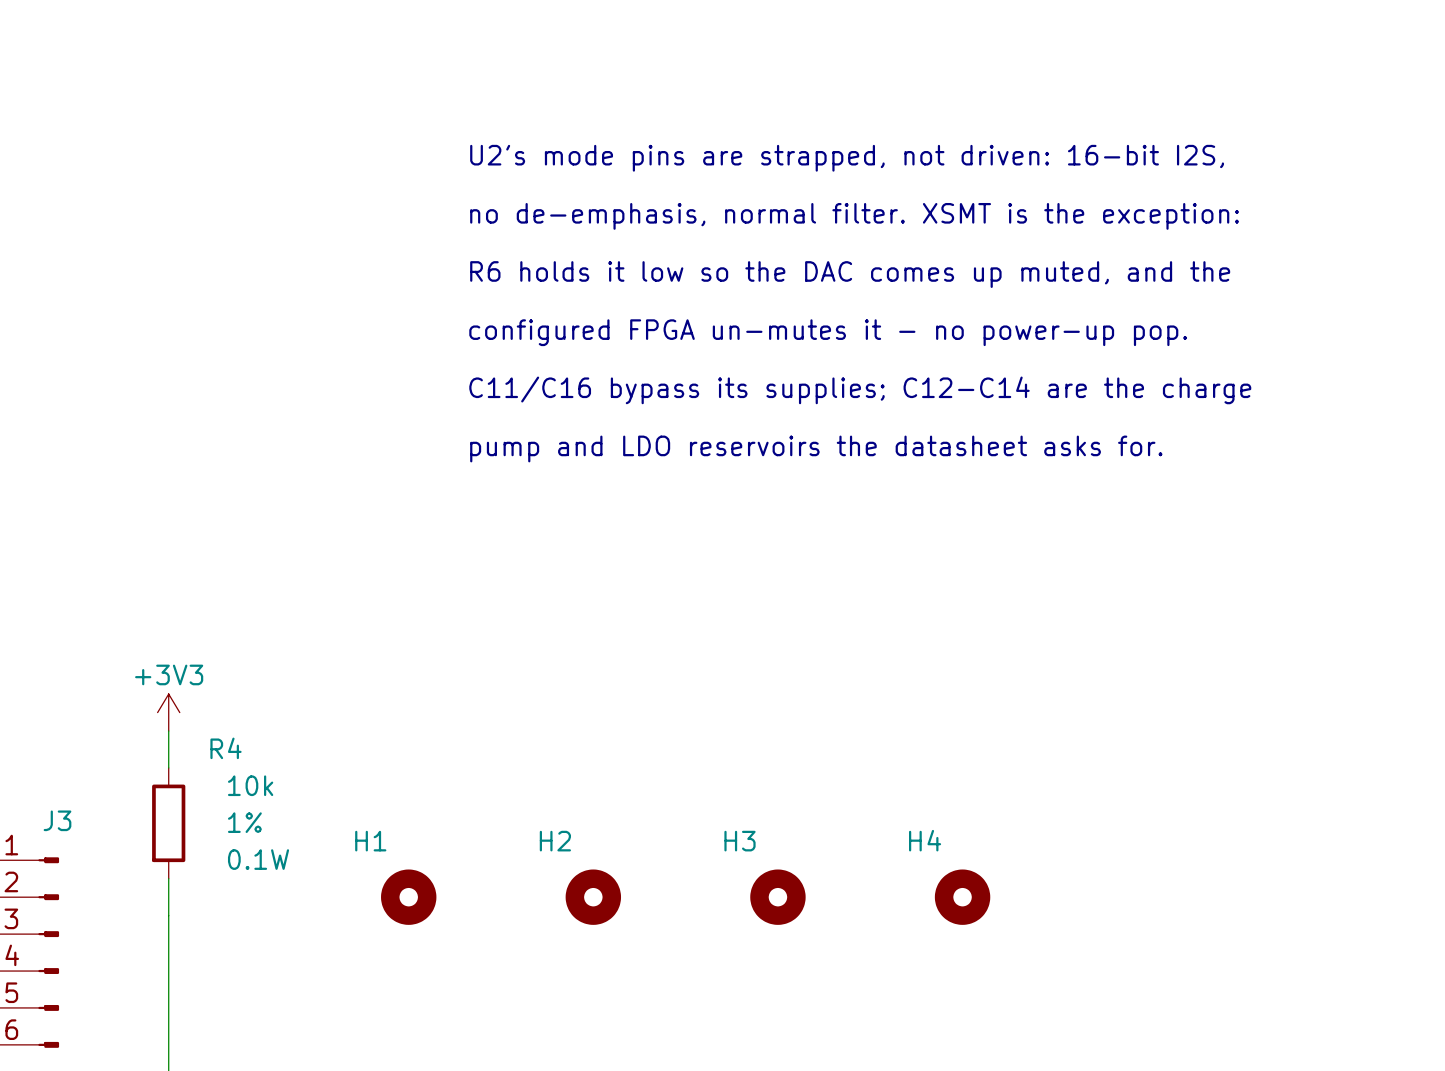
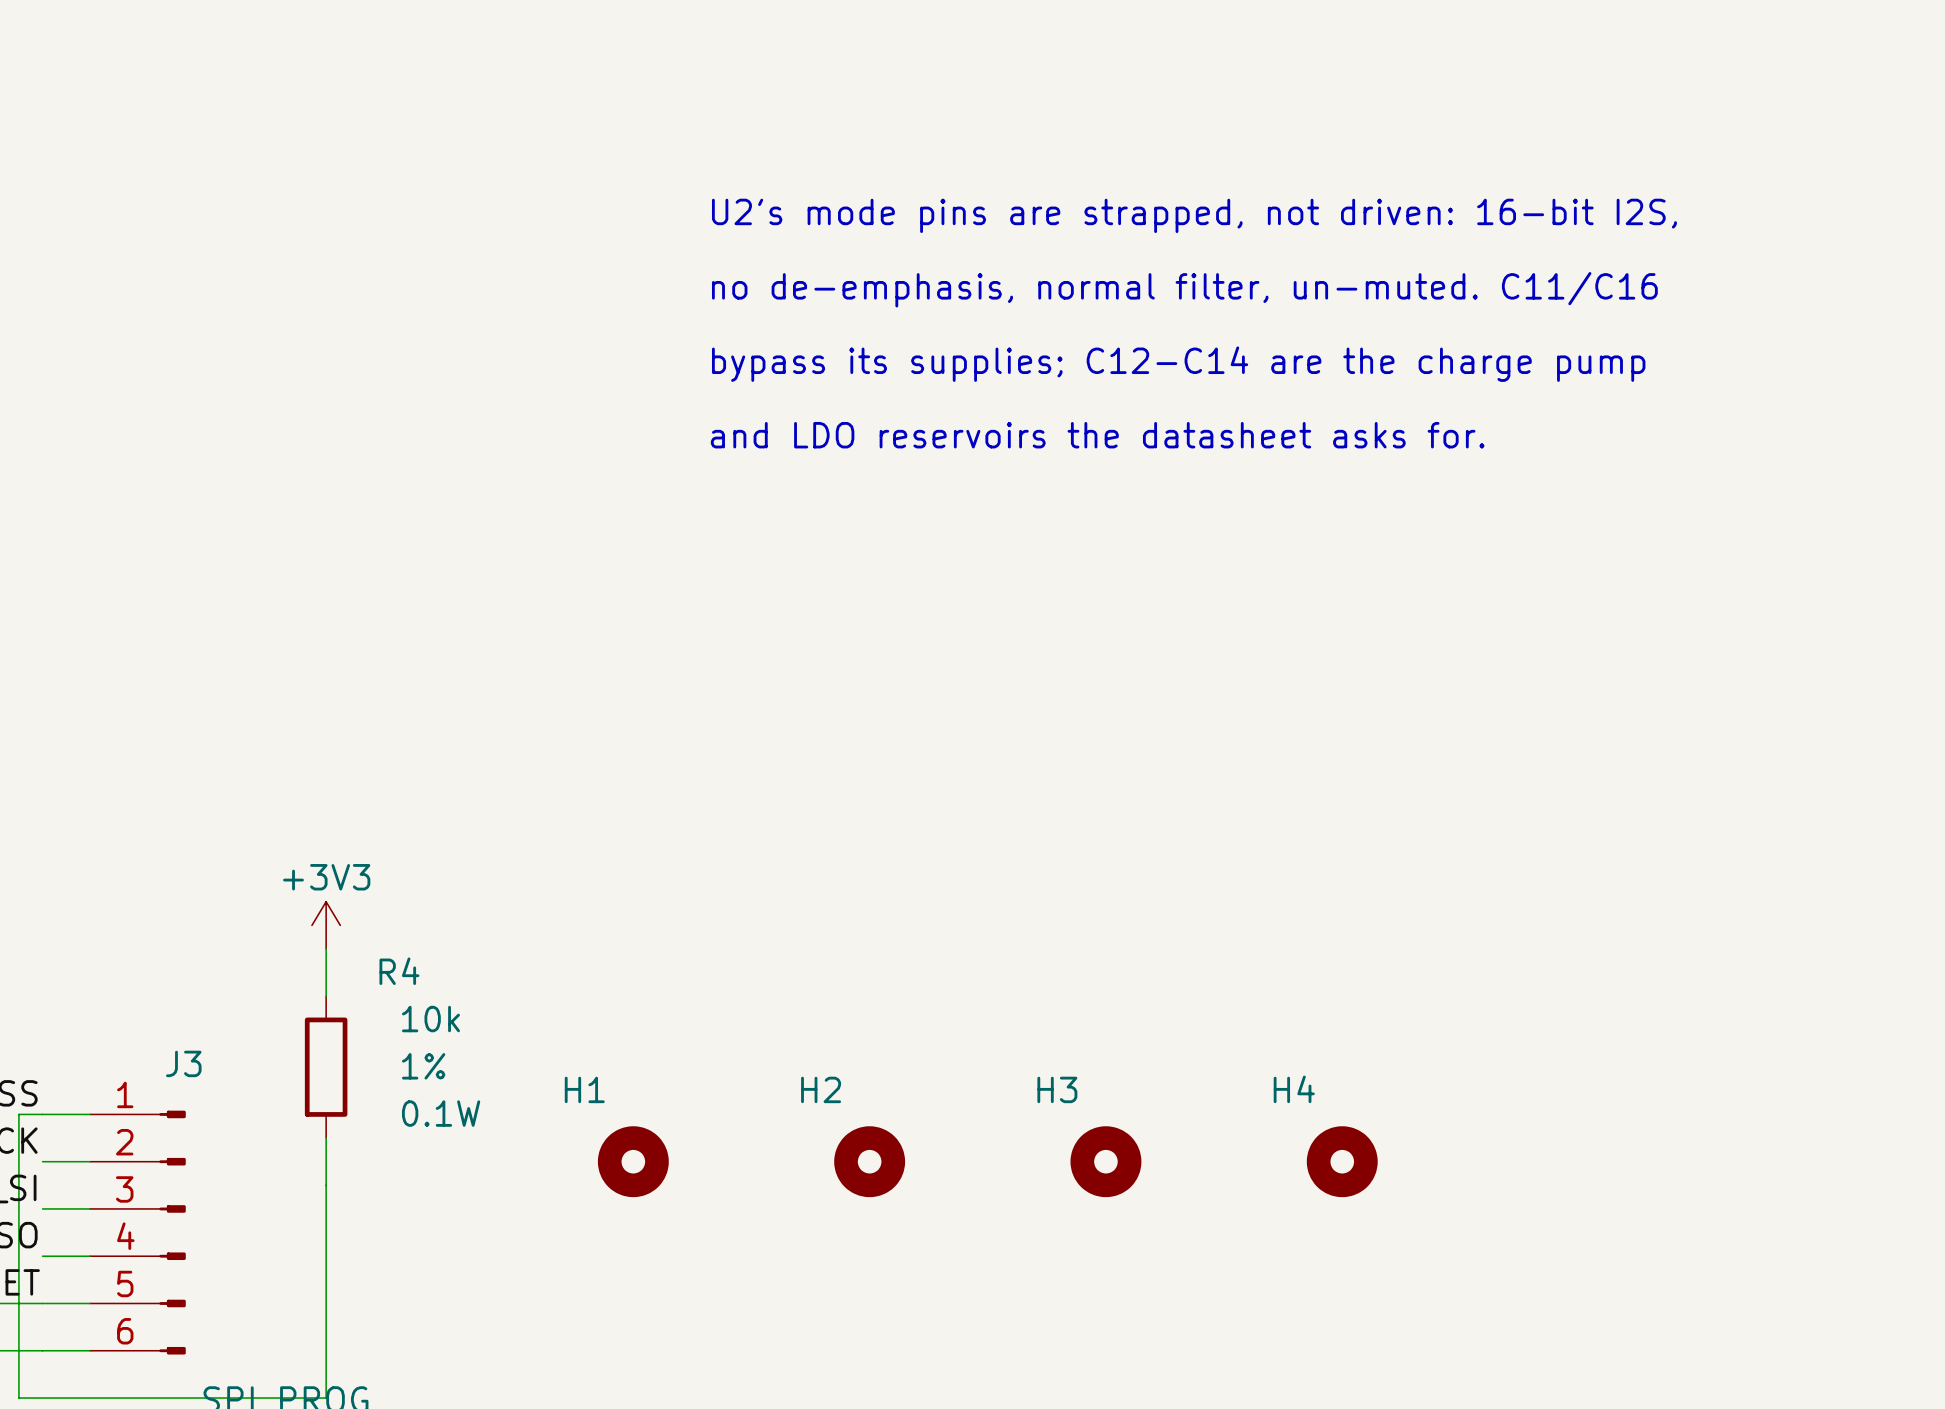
text: no de-emphasis, normal filter. XSMT is the exception: (854, 216) -> no de-emphasis, normal filter, un-muted. C11/C16 (1184, 289)
text: R6 holds it low so the DAC comes up muted, and the (850, 274) -> bypass its supplies; C12-C14 are the charge pump (1178, 364)
text: configured FPGA un-mutes it - no power-up pop. (828, 332) -> and LDO reservoirs the datasheet asks for. (1097, 435)
text: C11/C16 bypass its supplies; C12-C14 are the charge (860, 390) -> none
text: pump and LDO reservoirs the datasheet asks for. (816, 448) -> none

